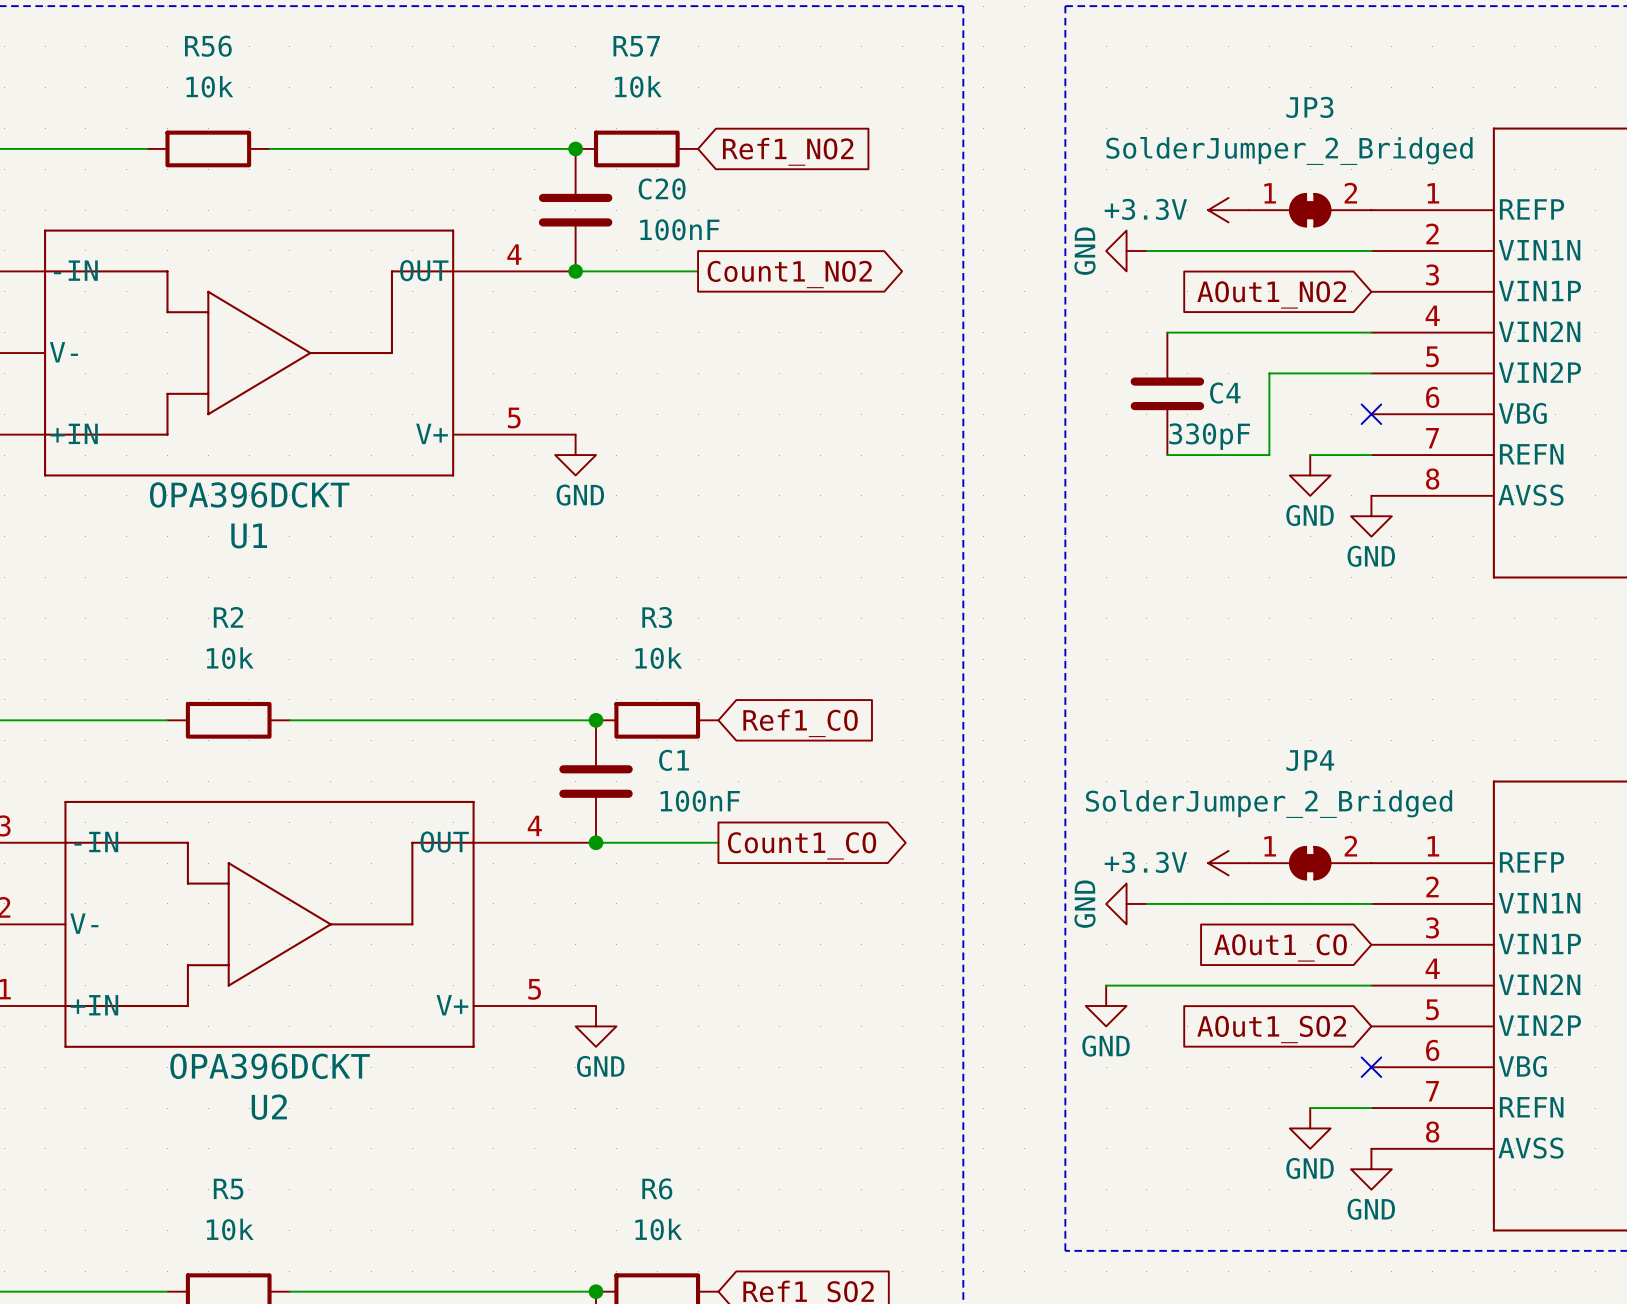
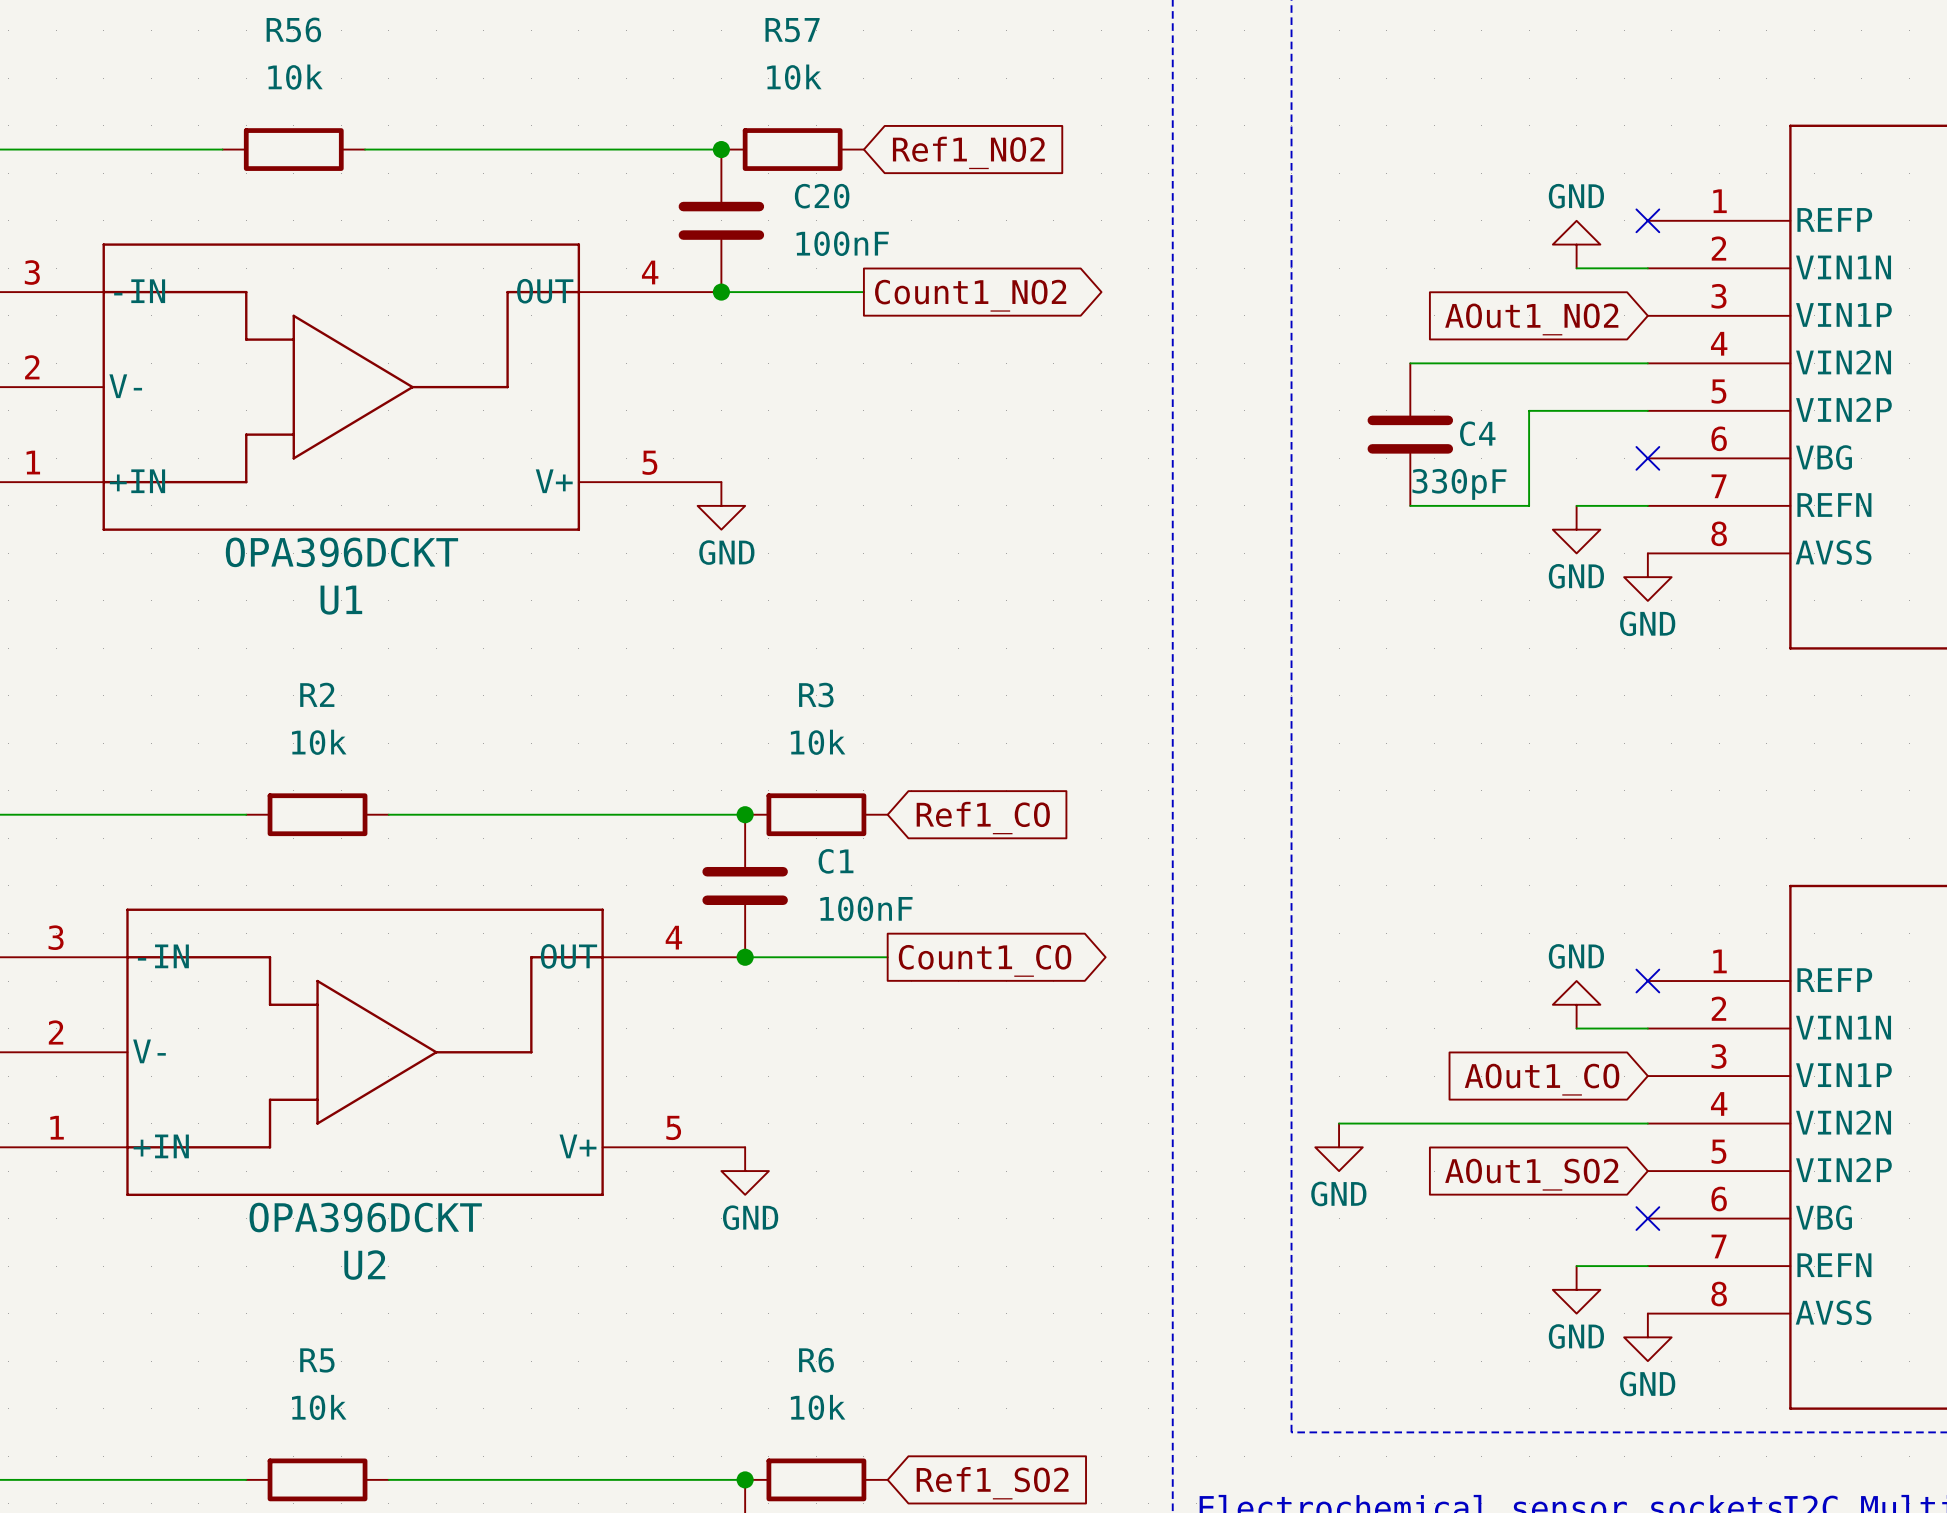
power symbol: +3.3V (1228, 210) -> none
JP3: SolderJumper_2_Bridged (1310, 210) -> none
no-connect mark: none -> (1647, 220)
power symbol rotation: 0° (1126, 250) -> 90° clockwise (1576, 244)
power symbol position: GND (1126, 250) -> GND (1576, 244)
wire: (1146, 250) (1310, 250) -> none
power symbol: +3.3V (1228, 863) -> none
JP4: SolderJumper_2_Bridged (1310, 863) -> none
no-connect mark: none -> (1647, 981)
power symbol rotation: 0° (1126, 903) -> 90° clockwise (1576, 1004)
power symbol position: GND (1126, 903) -> GND (1576, 1004)
wire: (1146, 903) (1310, 903) -> none

